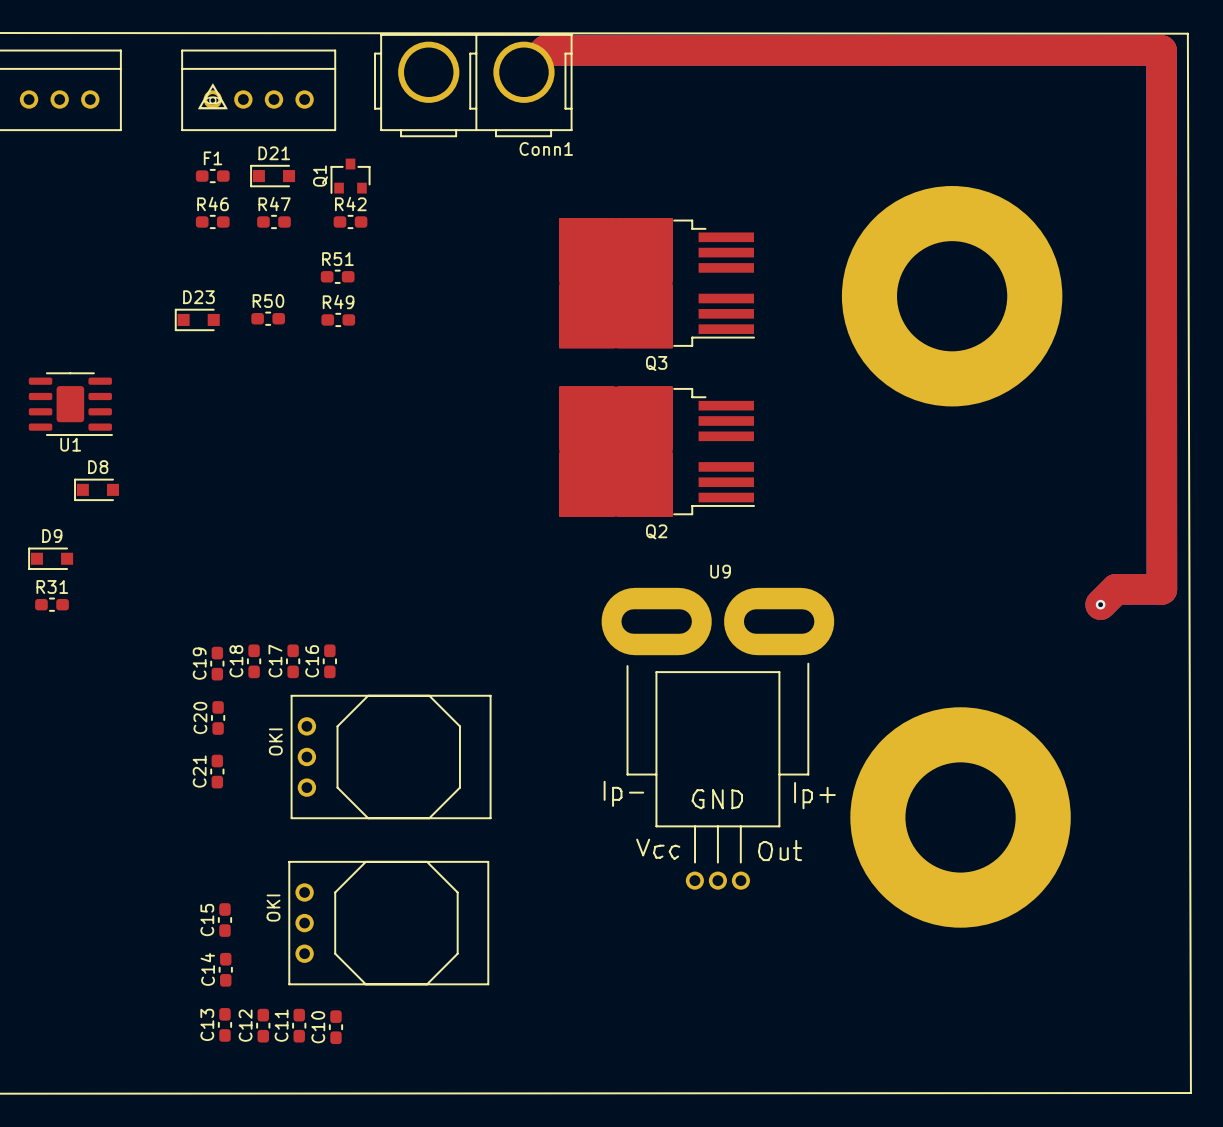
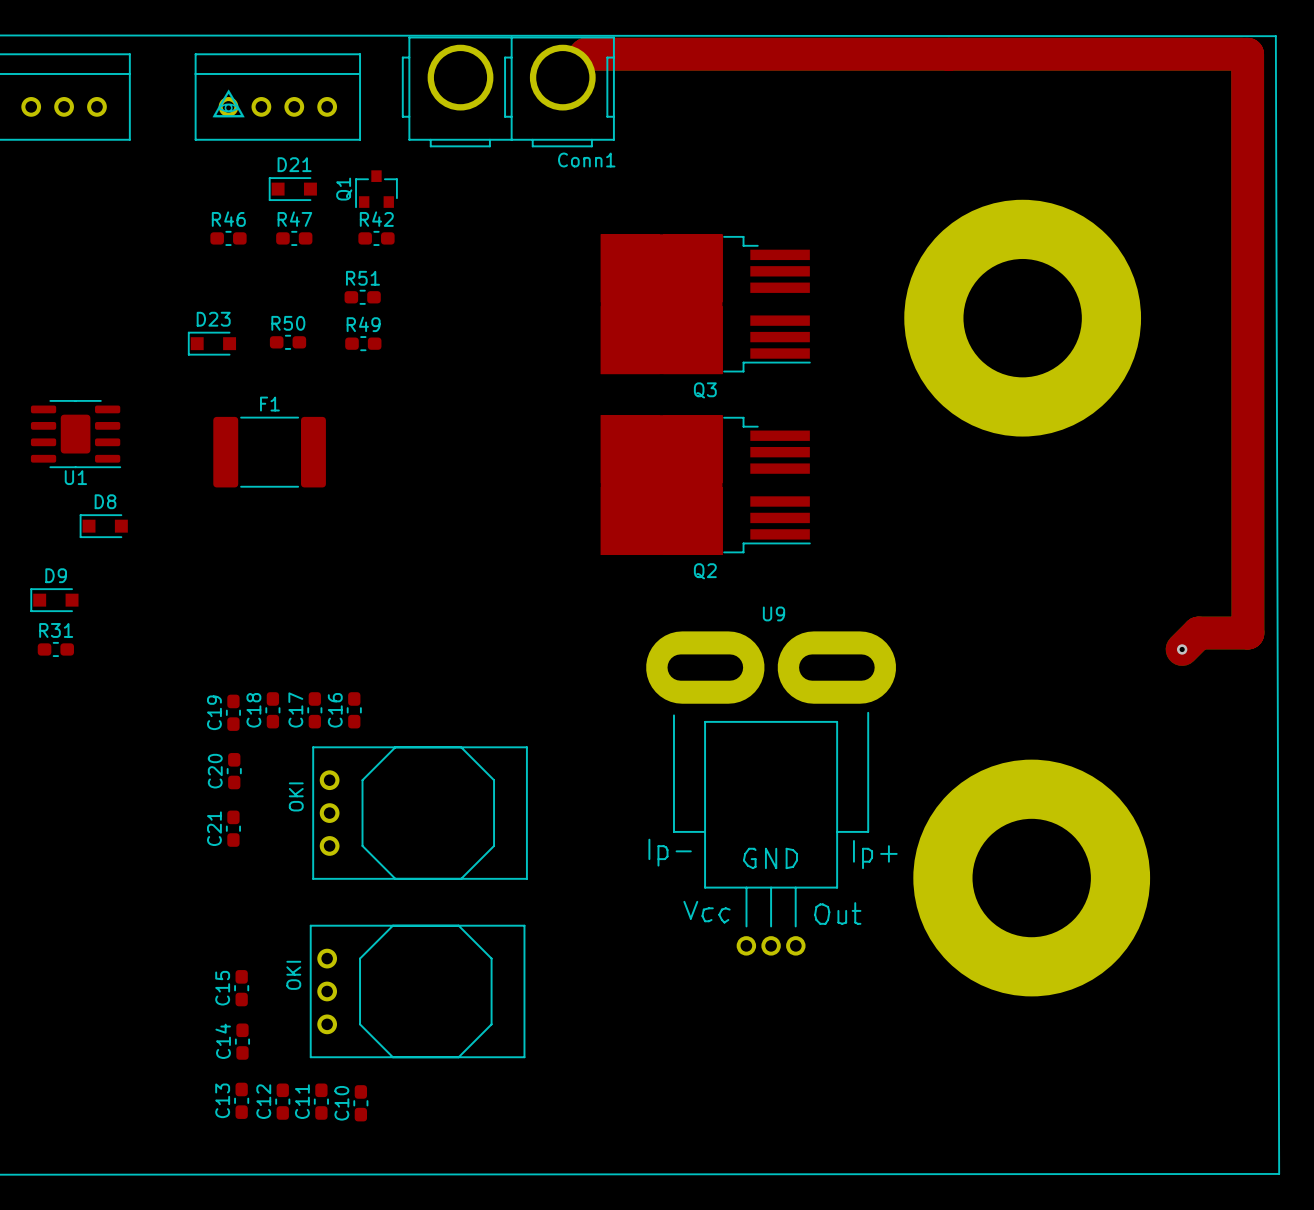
F1 name position: F1 (213, 158) -> F1 (269, 404)
F1 footprint: [195, 169, 230, 183] -> [213, 416, 326, 488]

